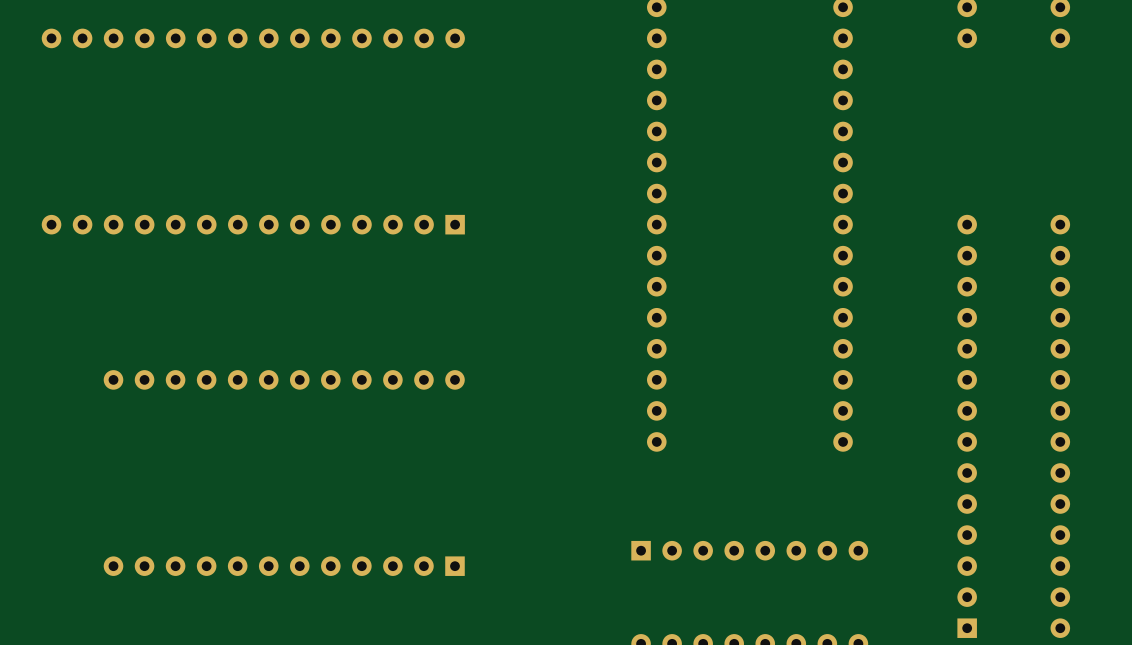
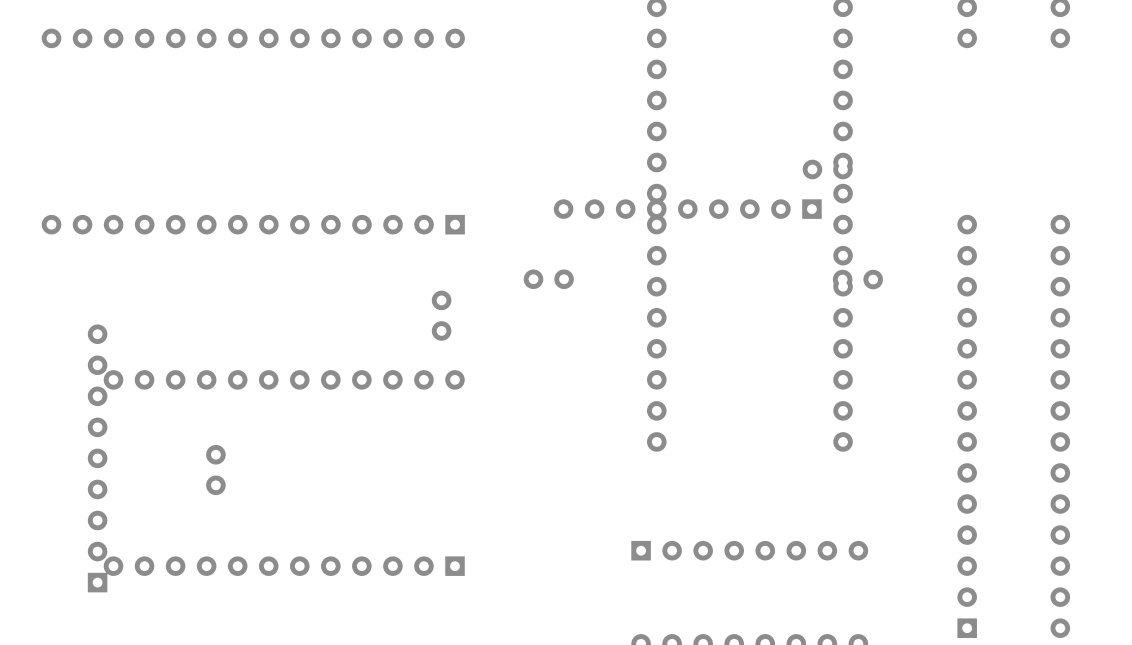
part: none -> (827, 169)
part: none -> (687, 209)
part: none -> (548, 279)
part: none -> (857, 279)
part: none -> (441, 315)
part: none -> (97, 458)
part: none -> (215, 470)

